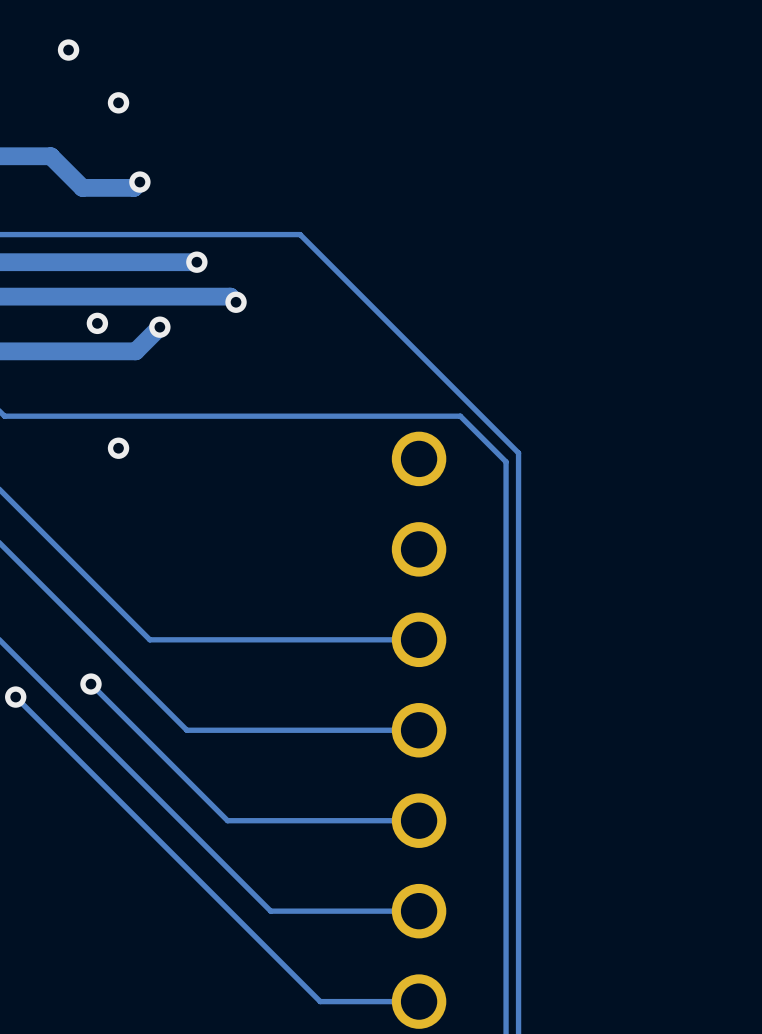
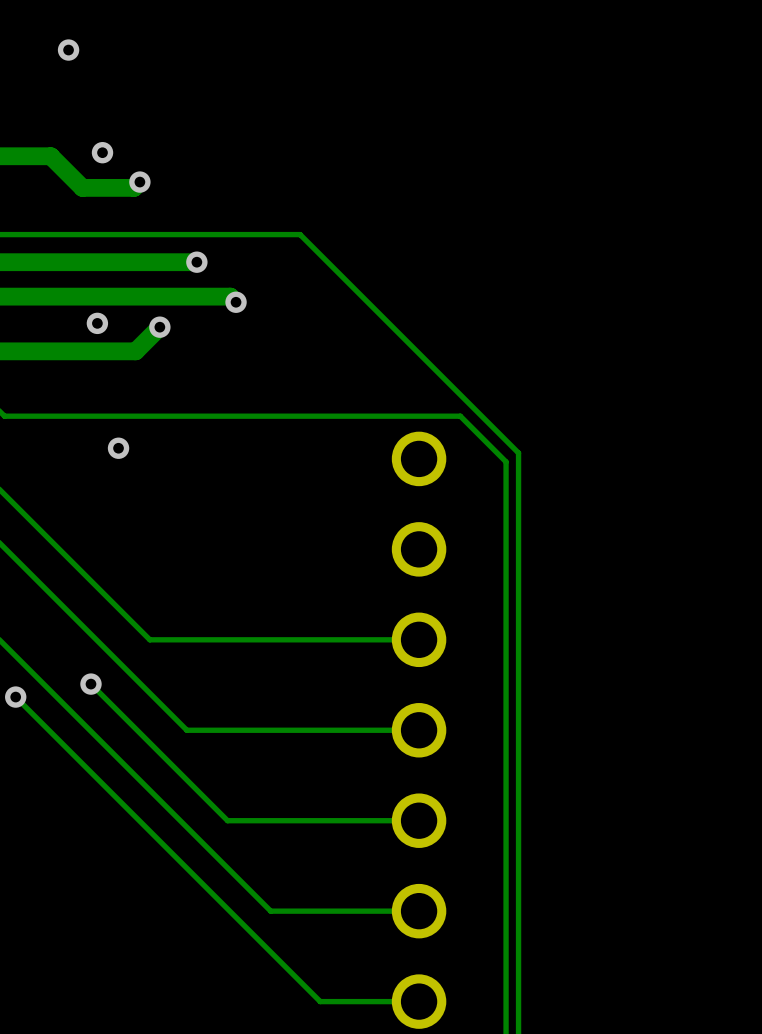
via position: (118, 102) -> (102, 152)

